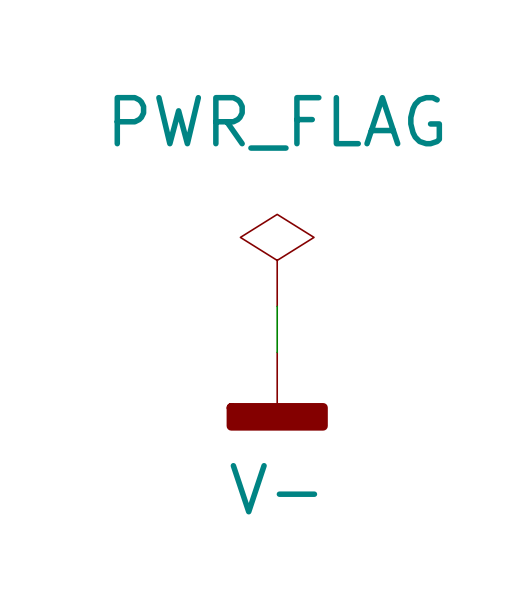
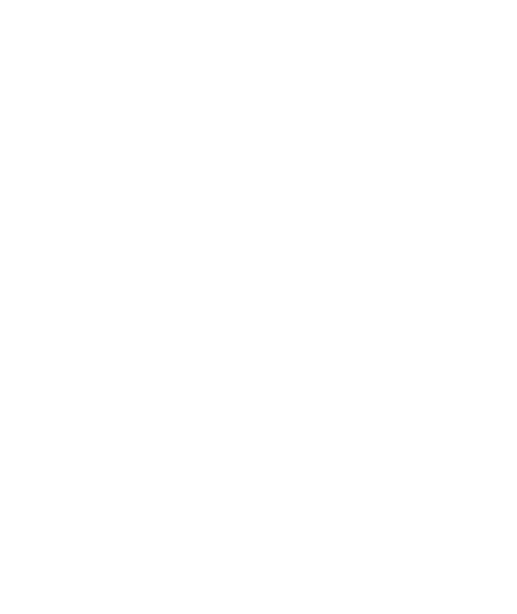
power symbol: PWR_FLAG (277, 260) -> none
wire: (277, 306) (277, 352) -> none
power symbol: V- (277, 391) -> none

